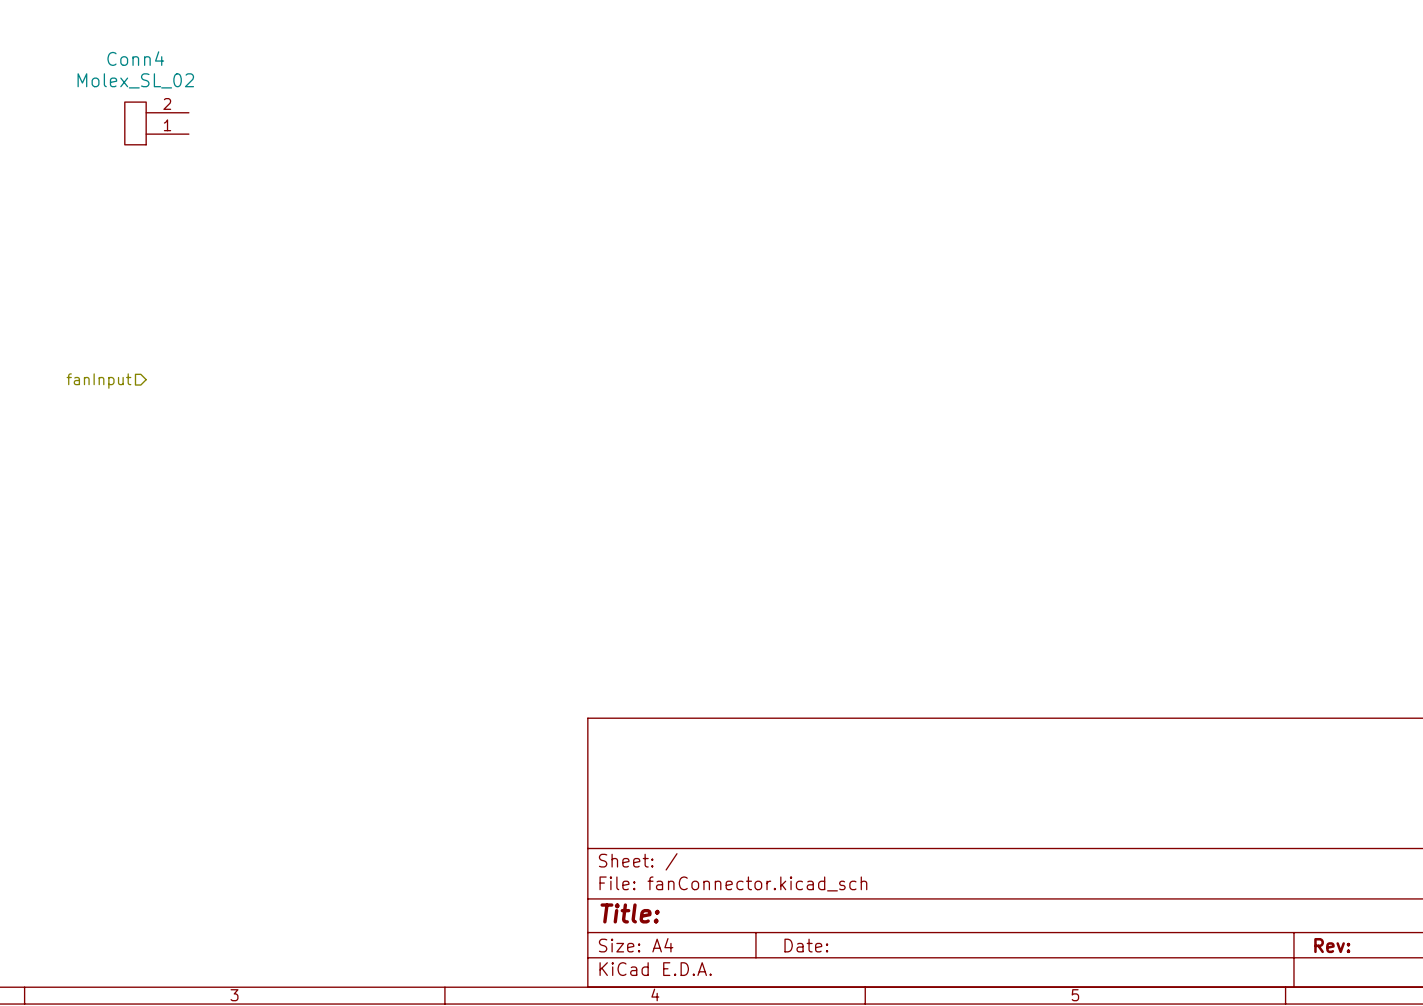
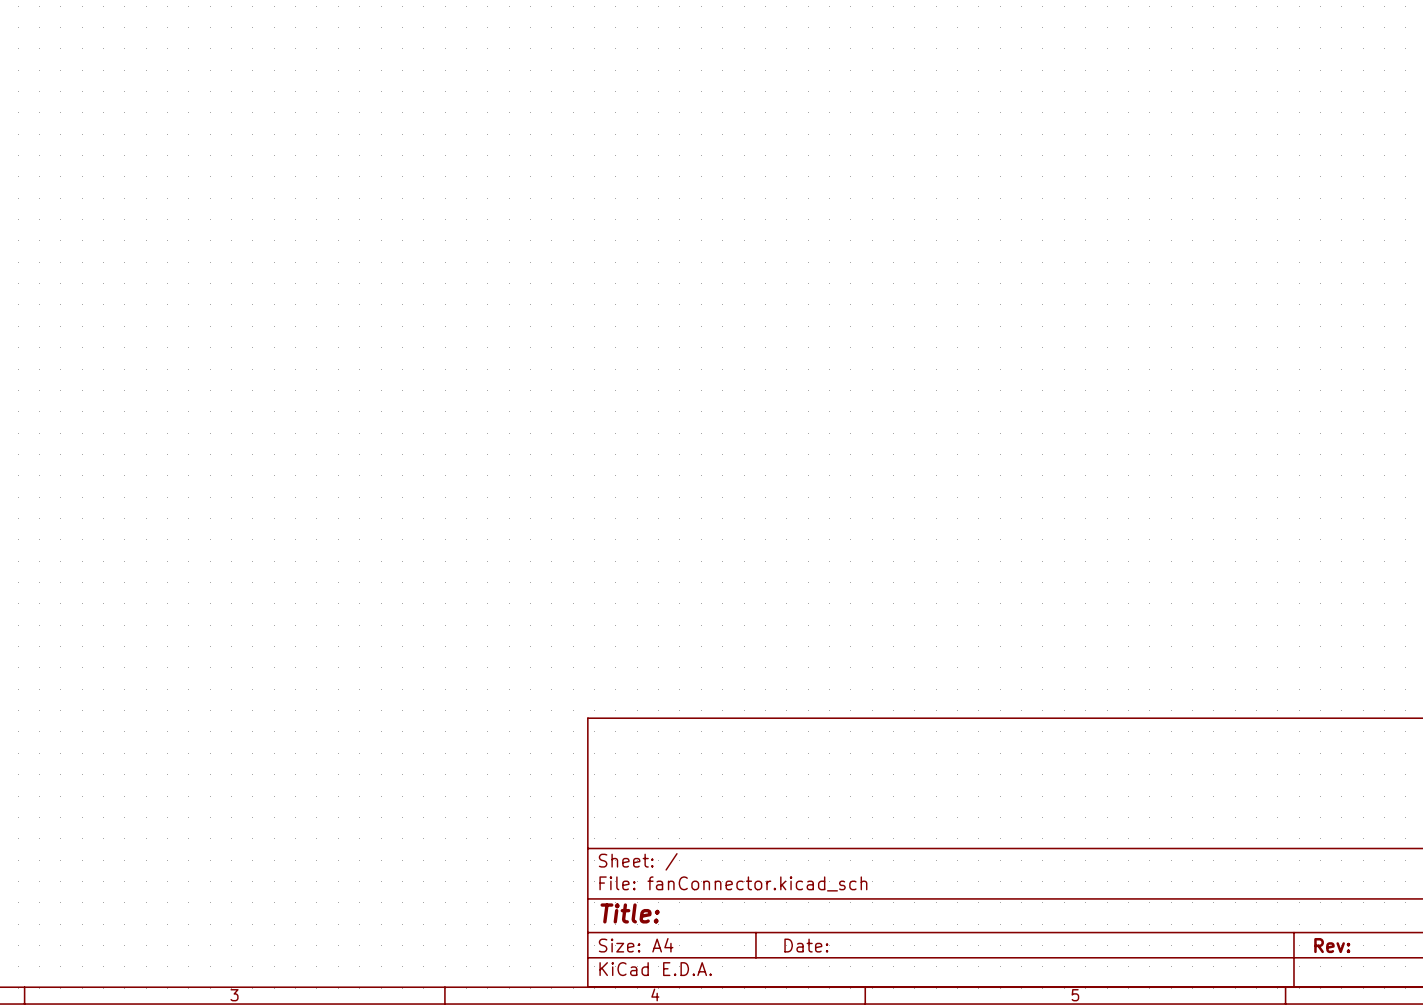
Conn4: Molex_SL_02 (156, 123) -> none
hierarchical label: fanInput (98, 381) -> none

